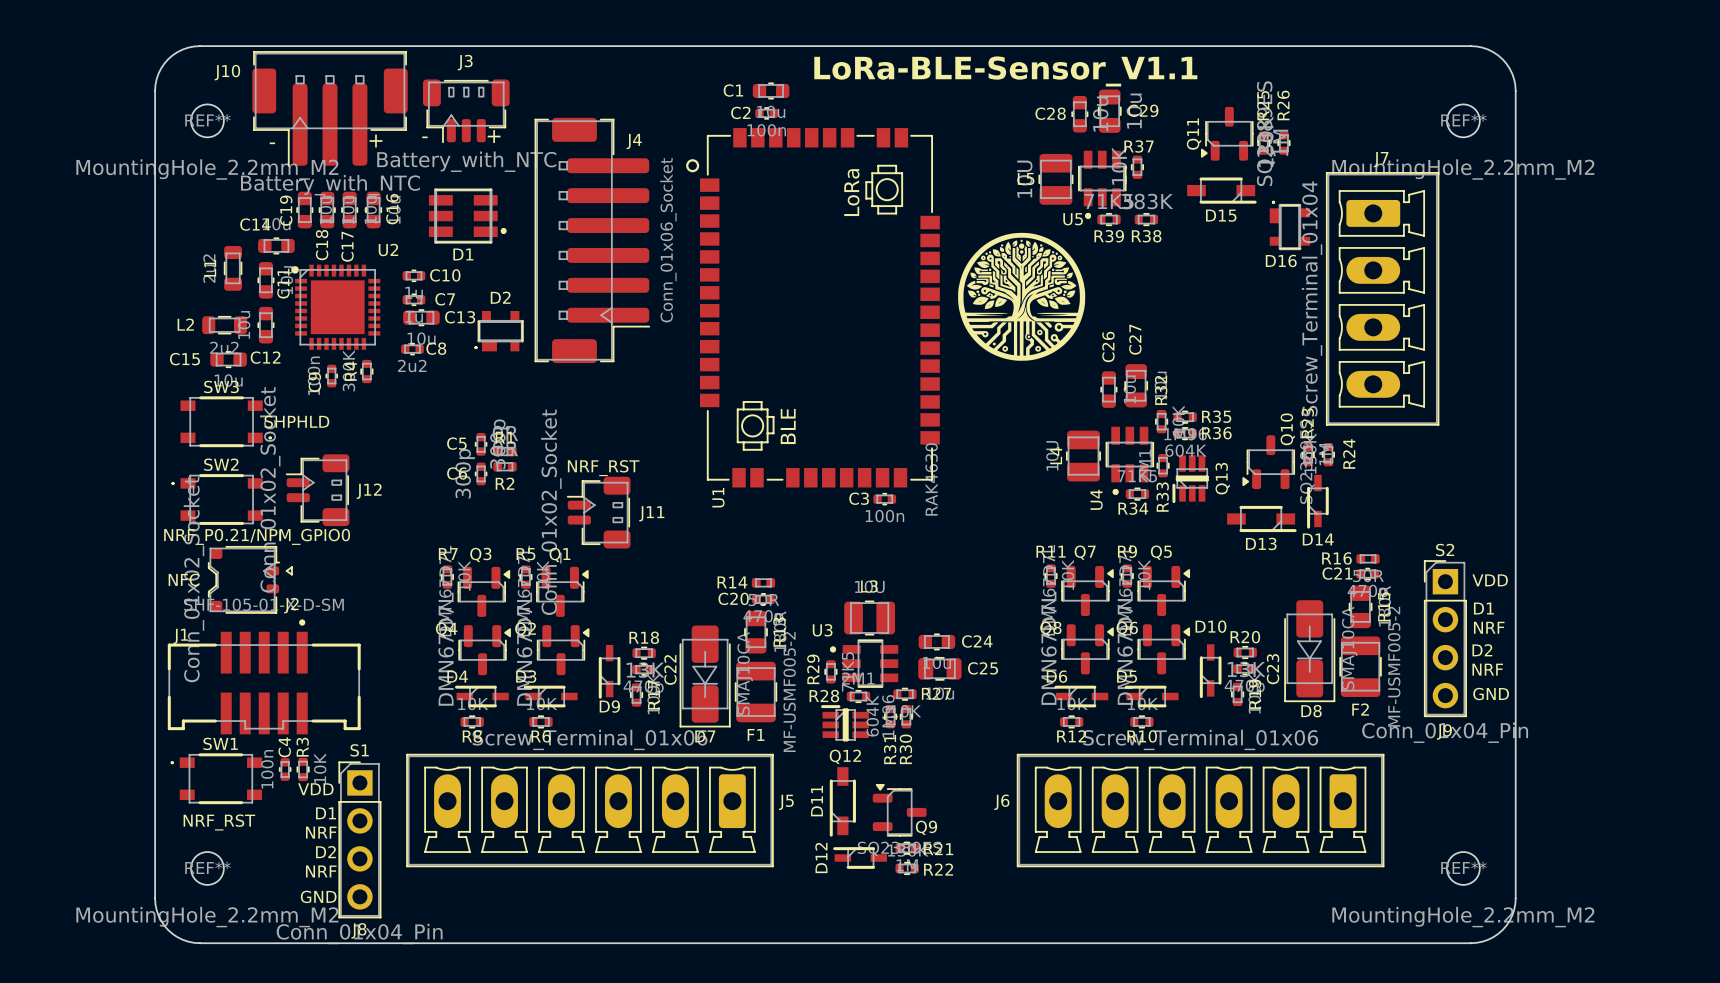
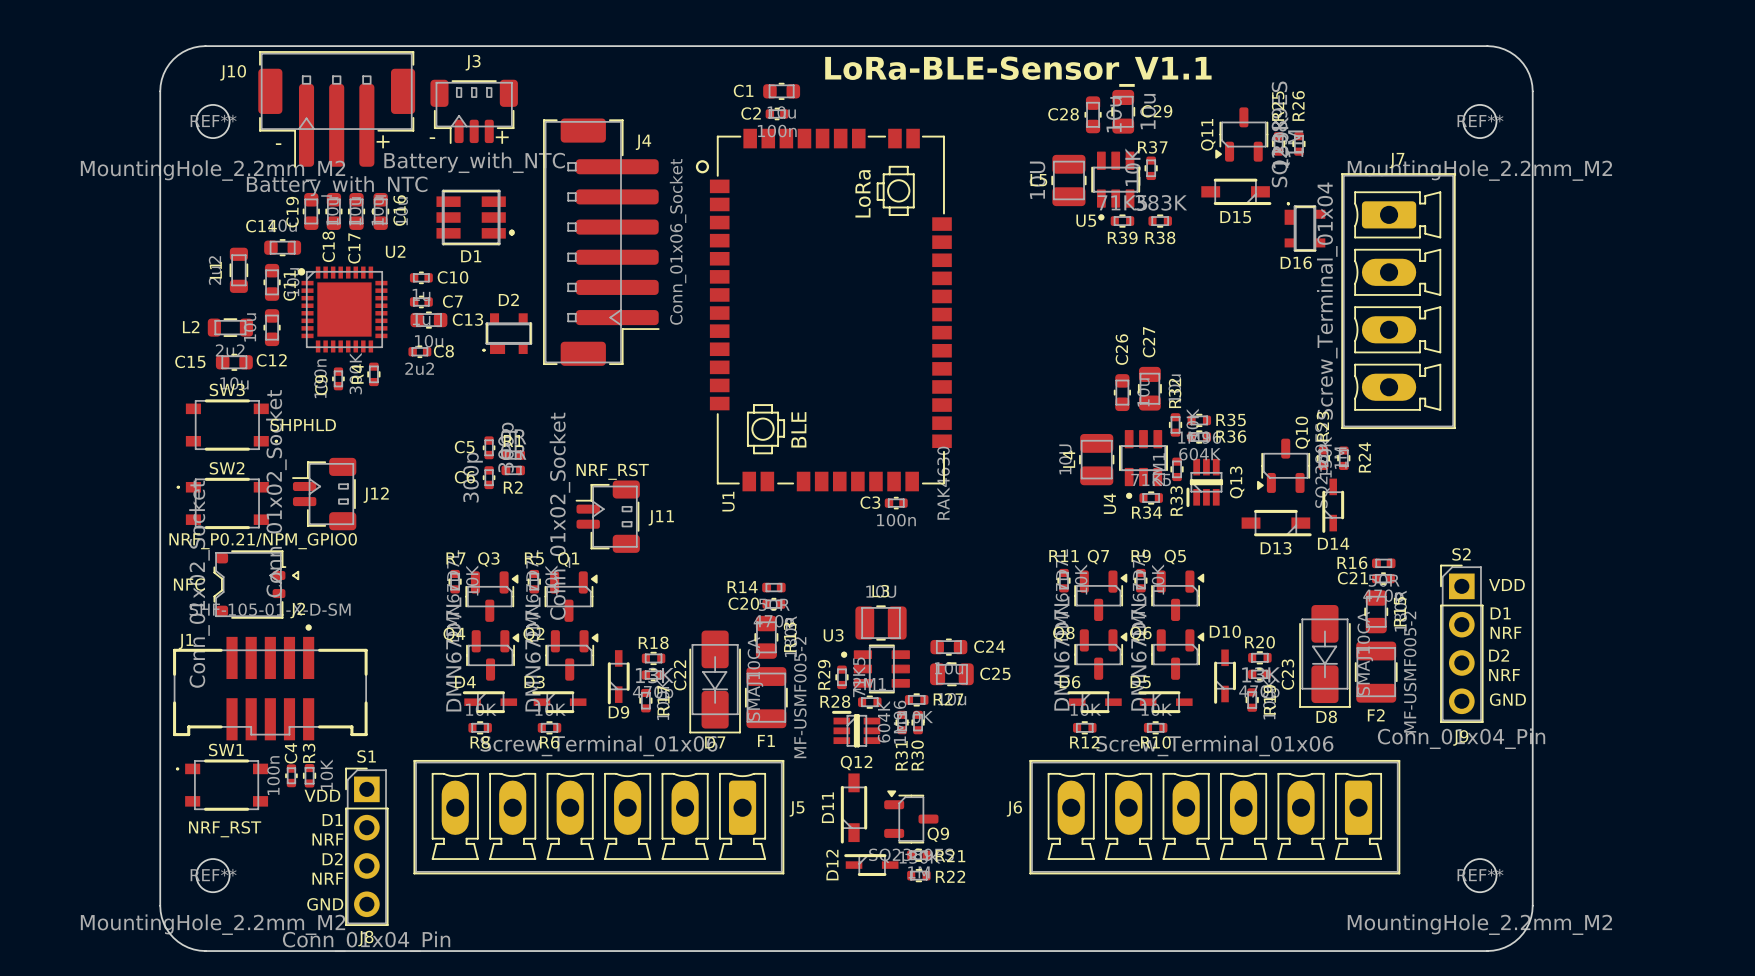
drawing: [958, 232, 1086, 361] -> none

